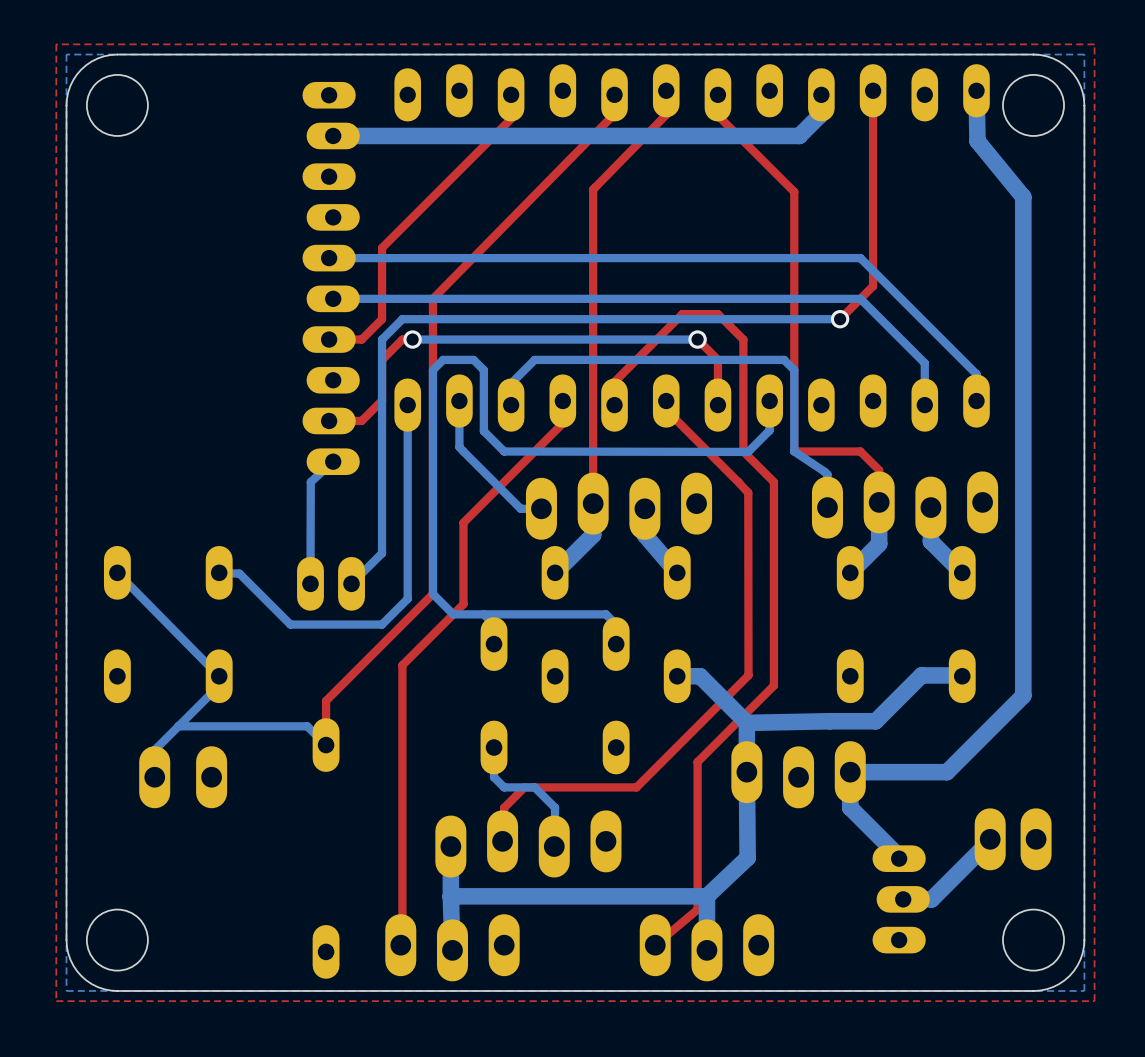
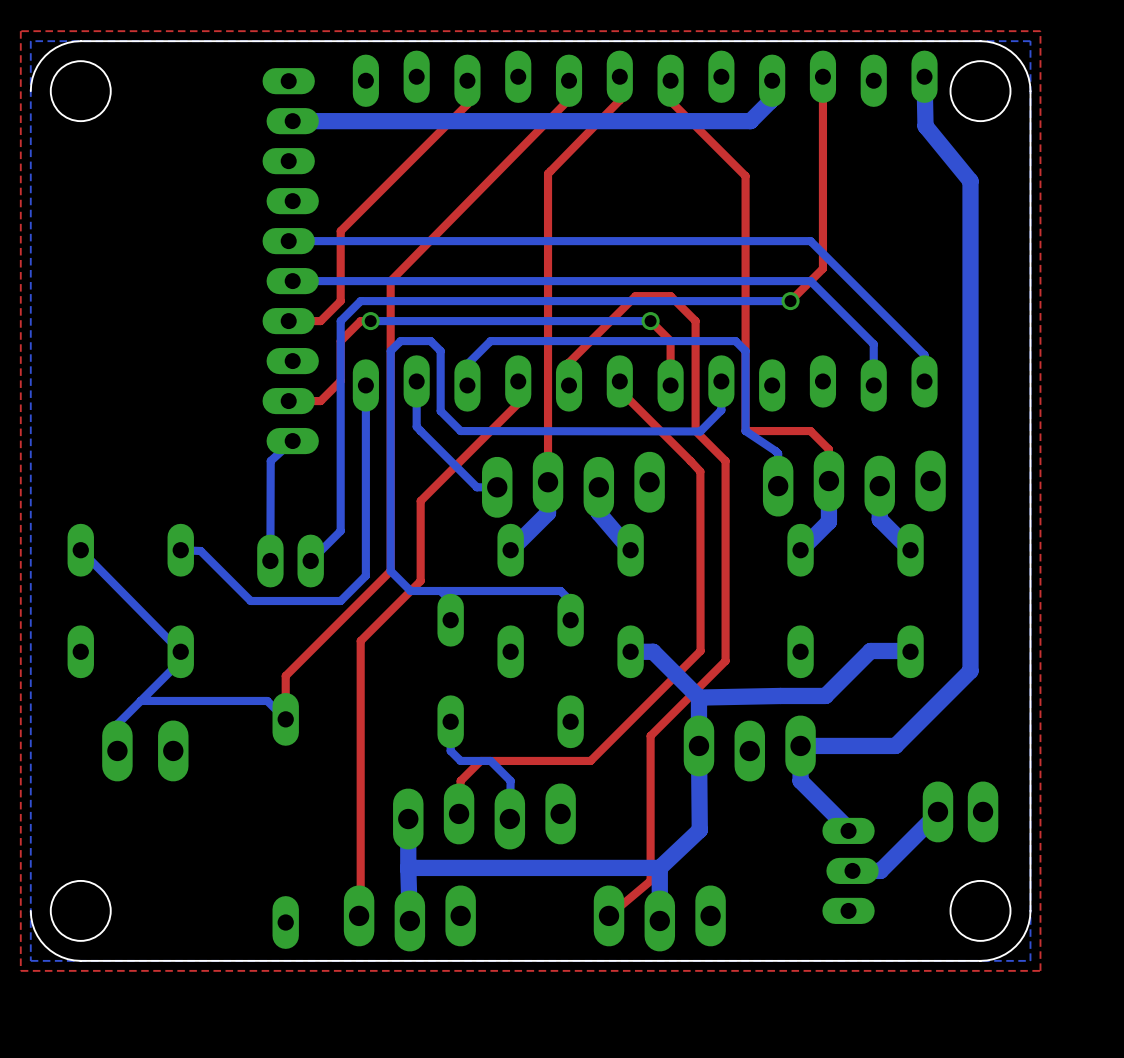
board edge: (66, 105) (66, 940) -> none

